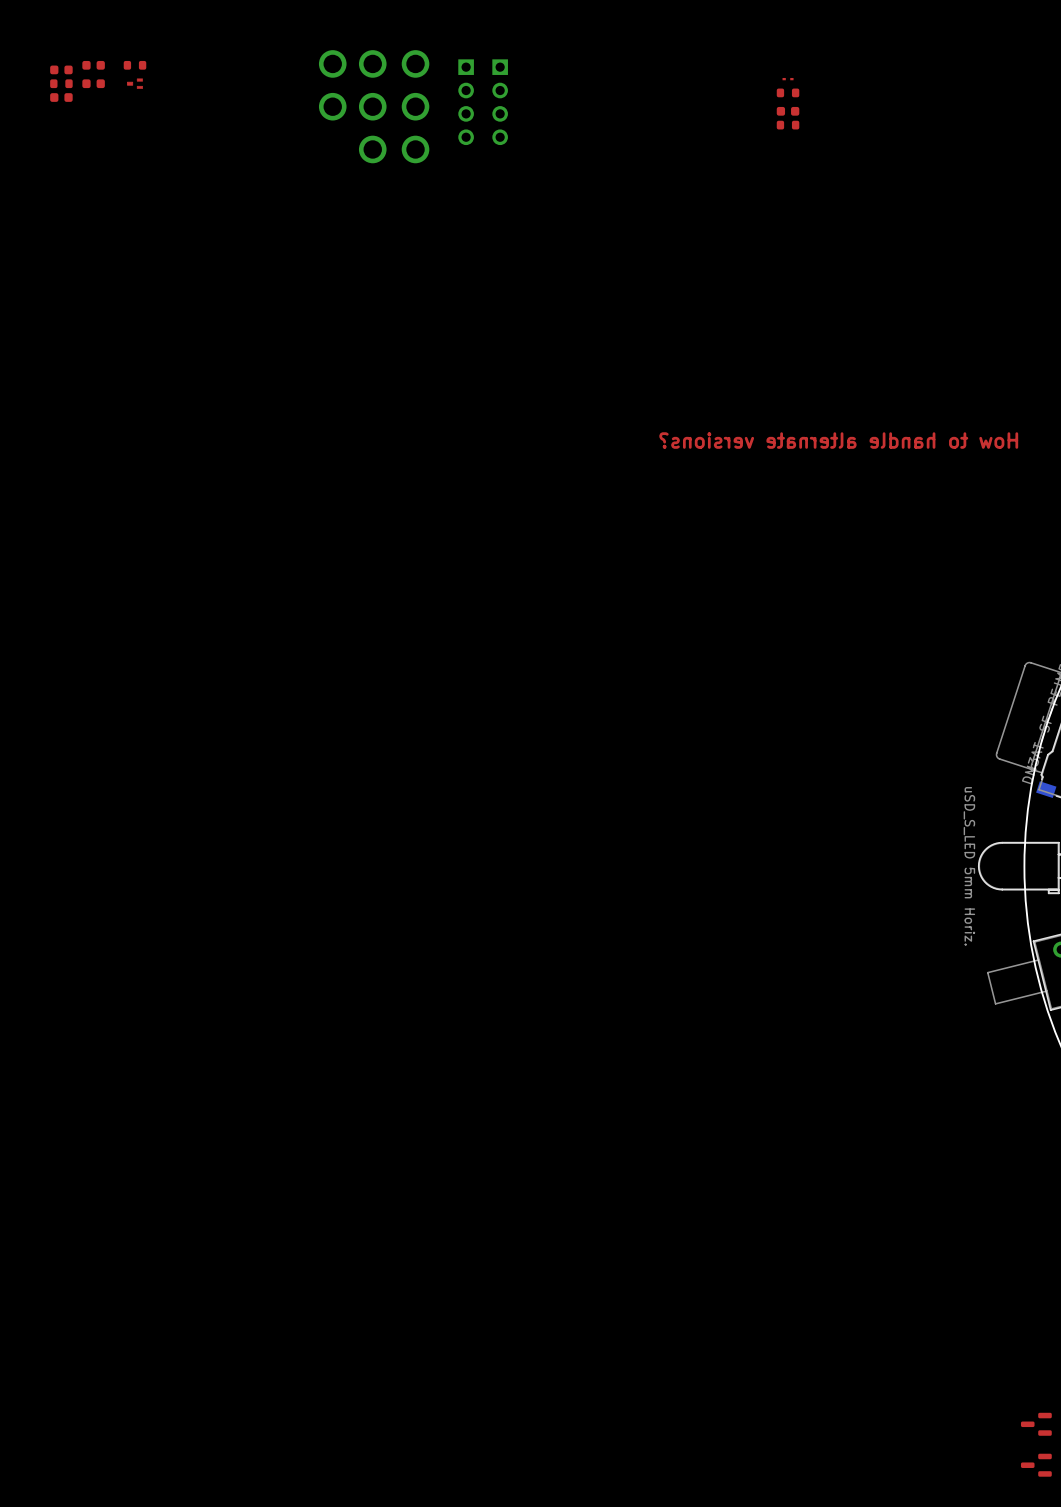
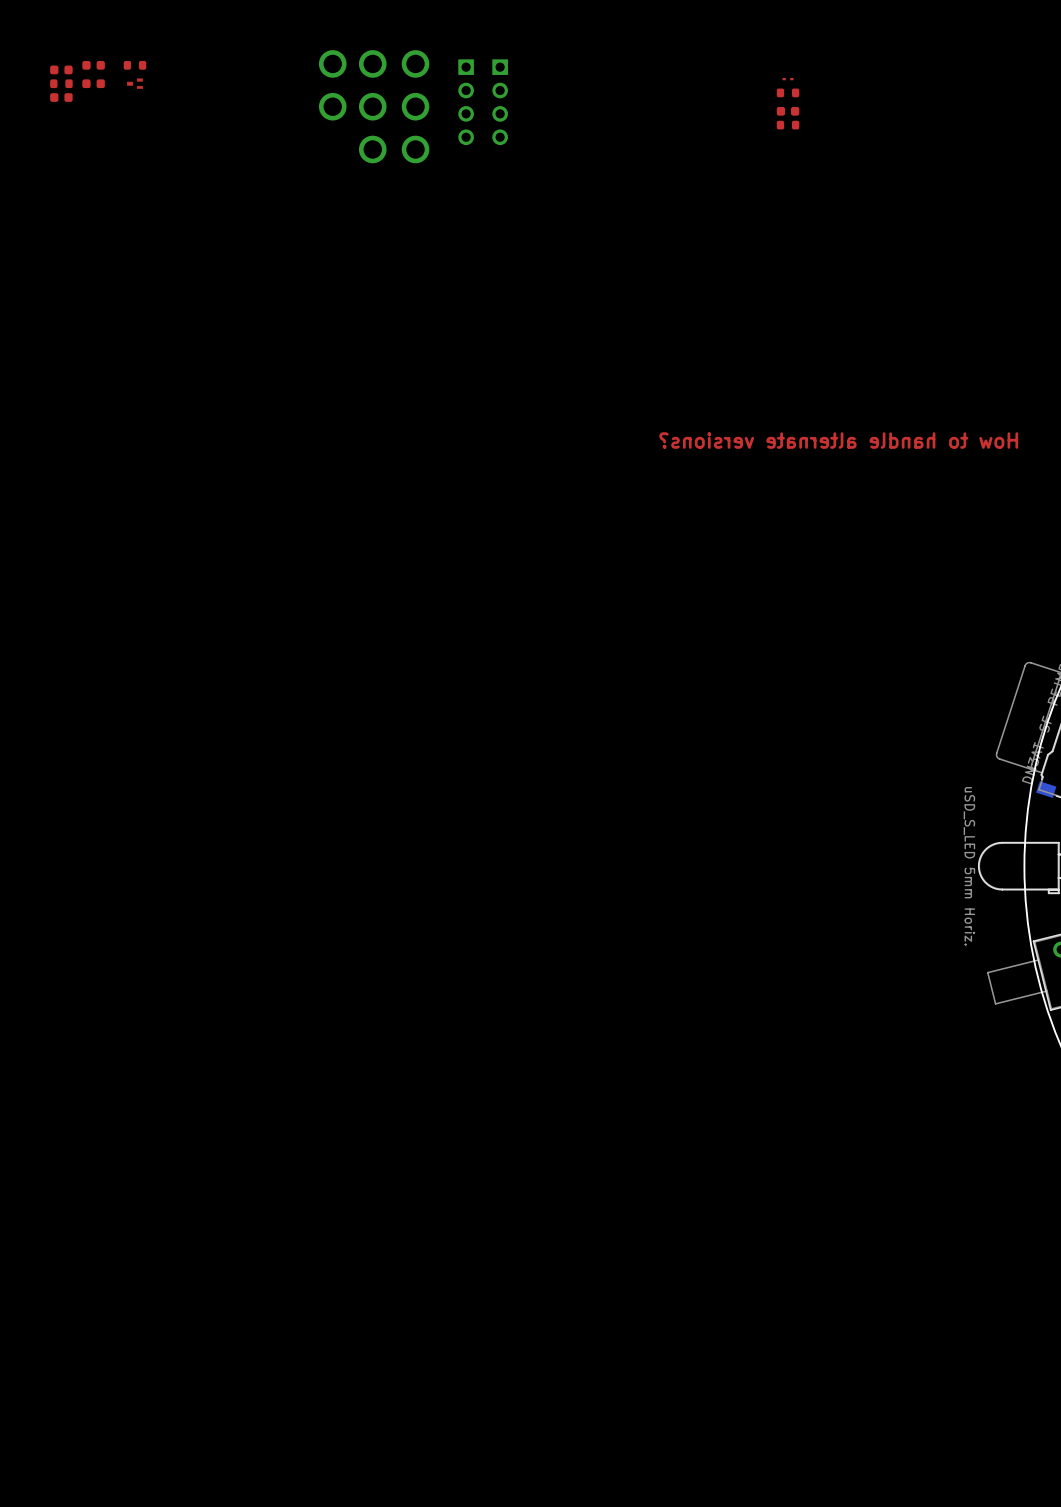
part: (1036, 1424) -> none
part: (1036, 1465) -> none

